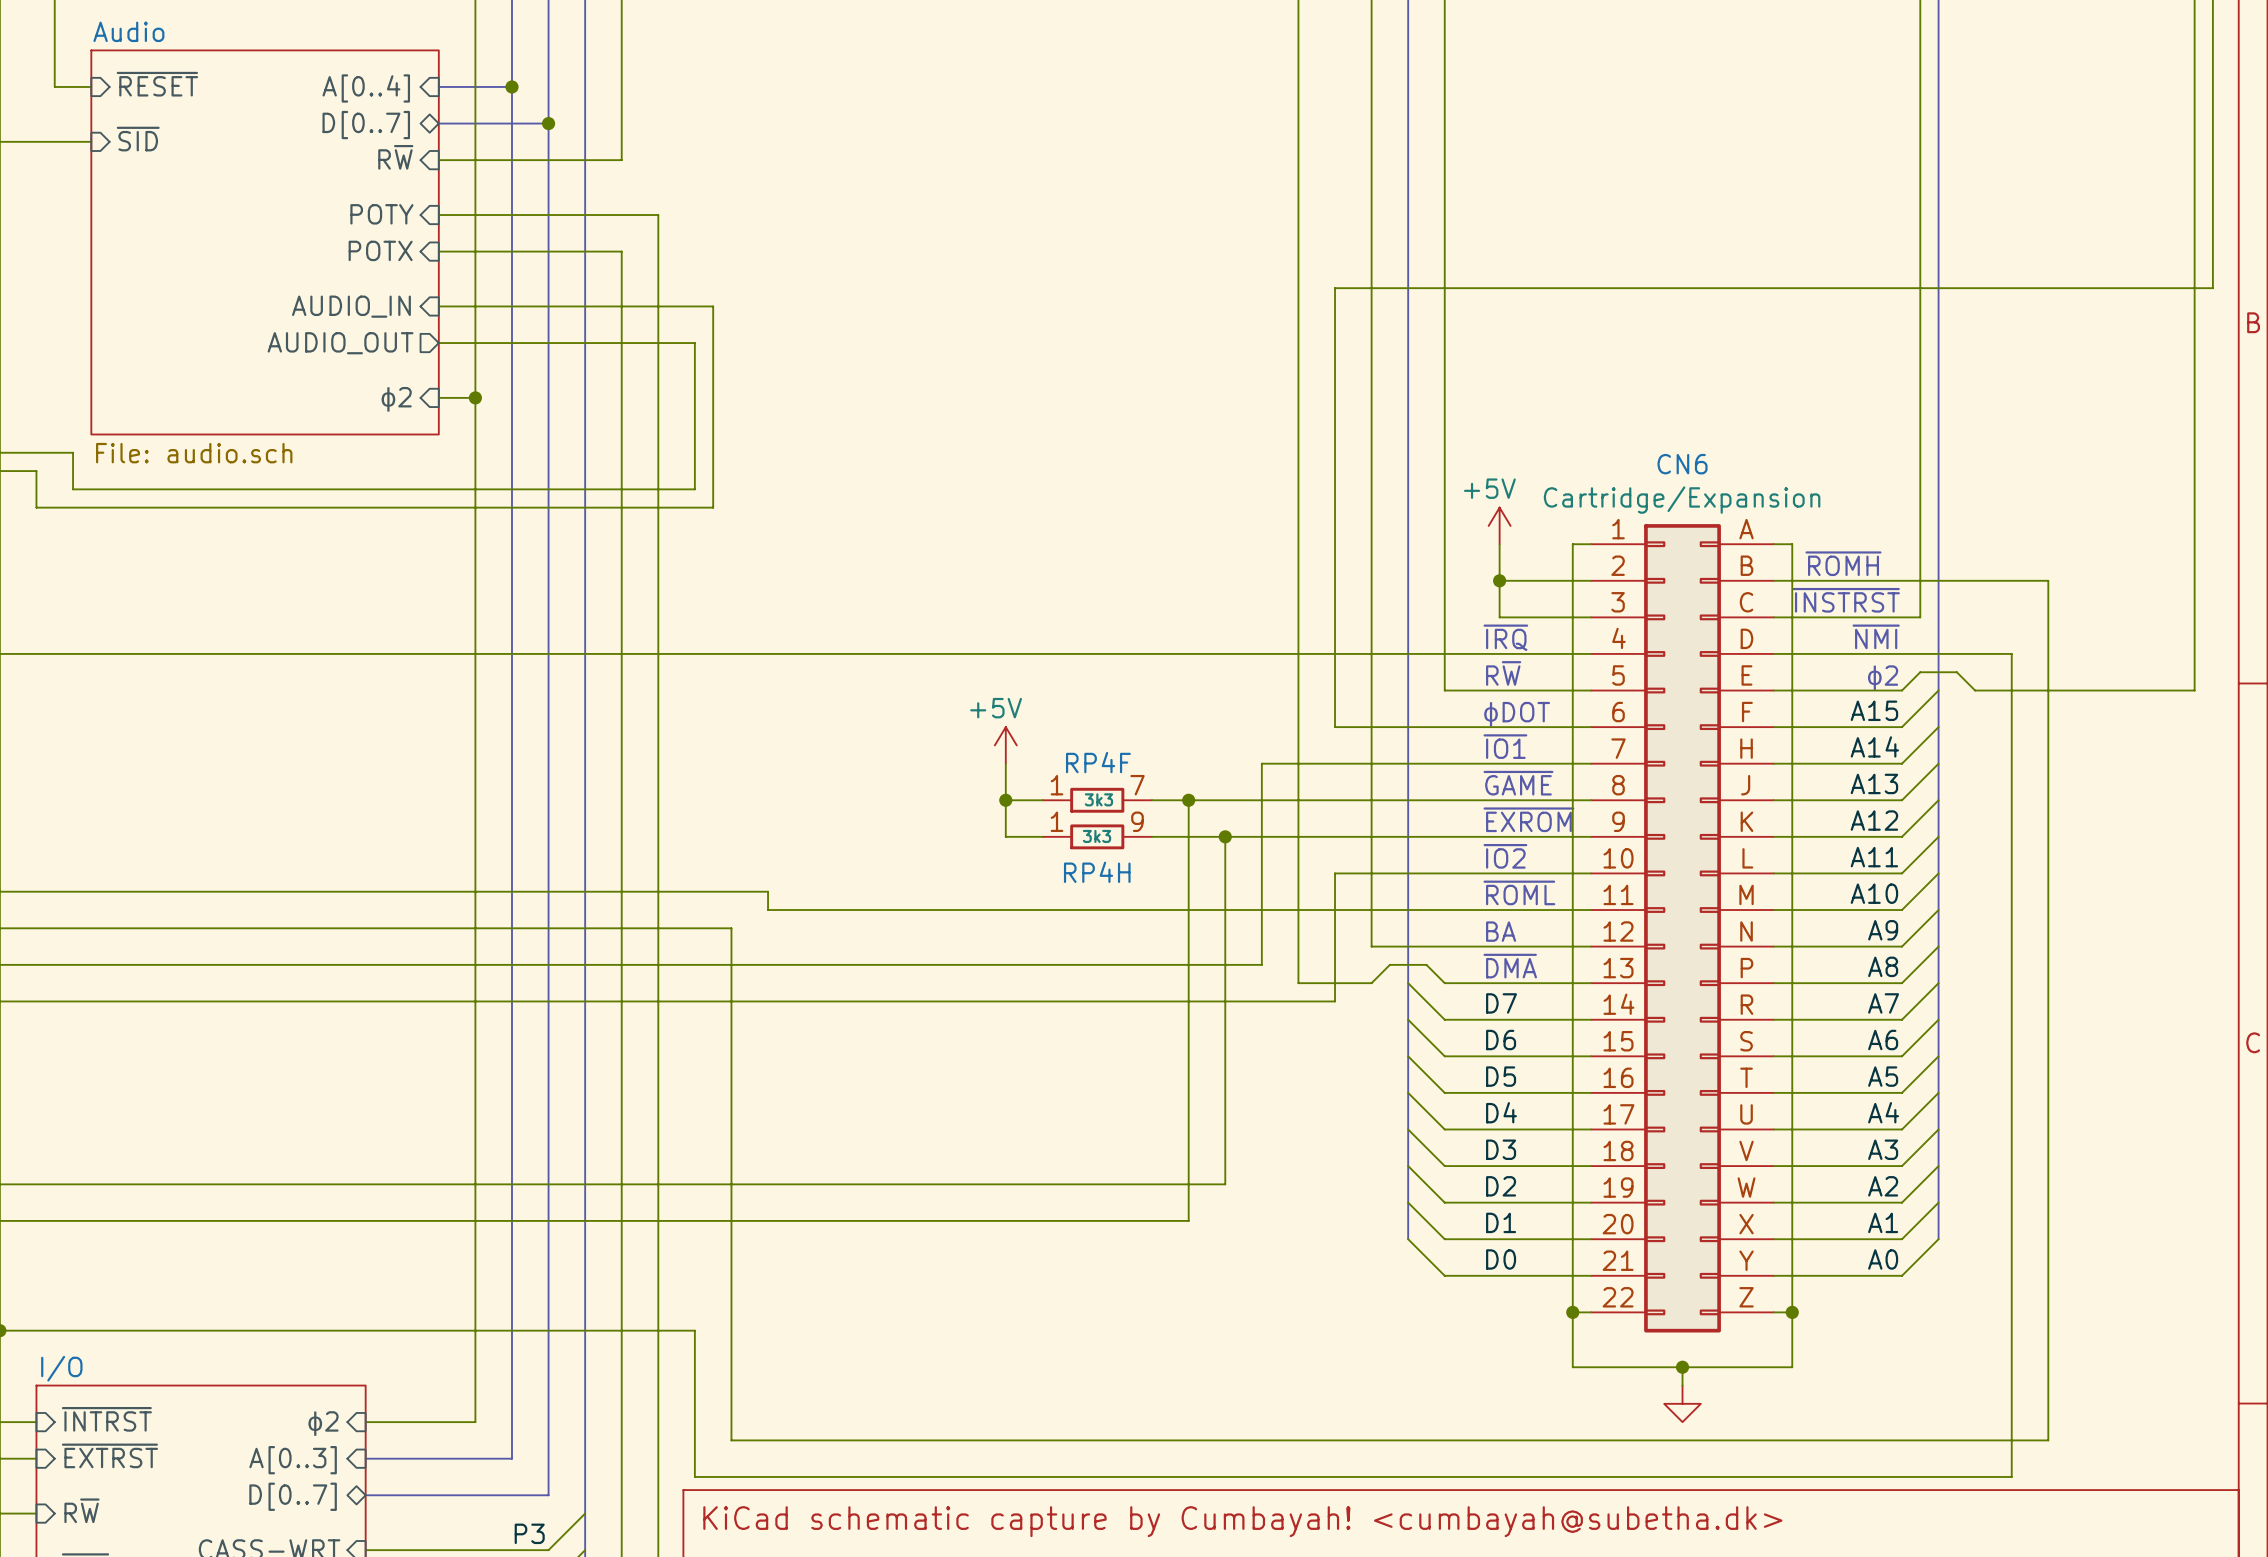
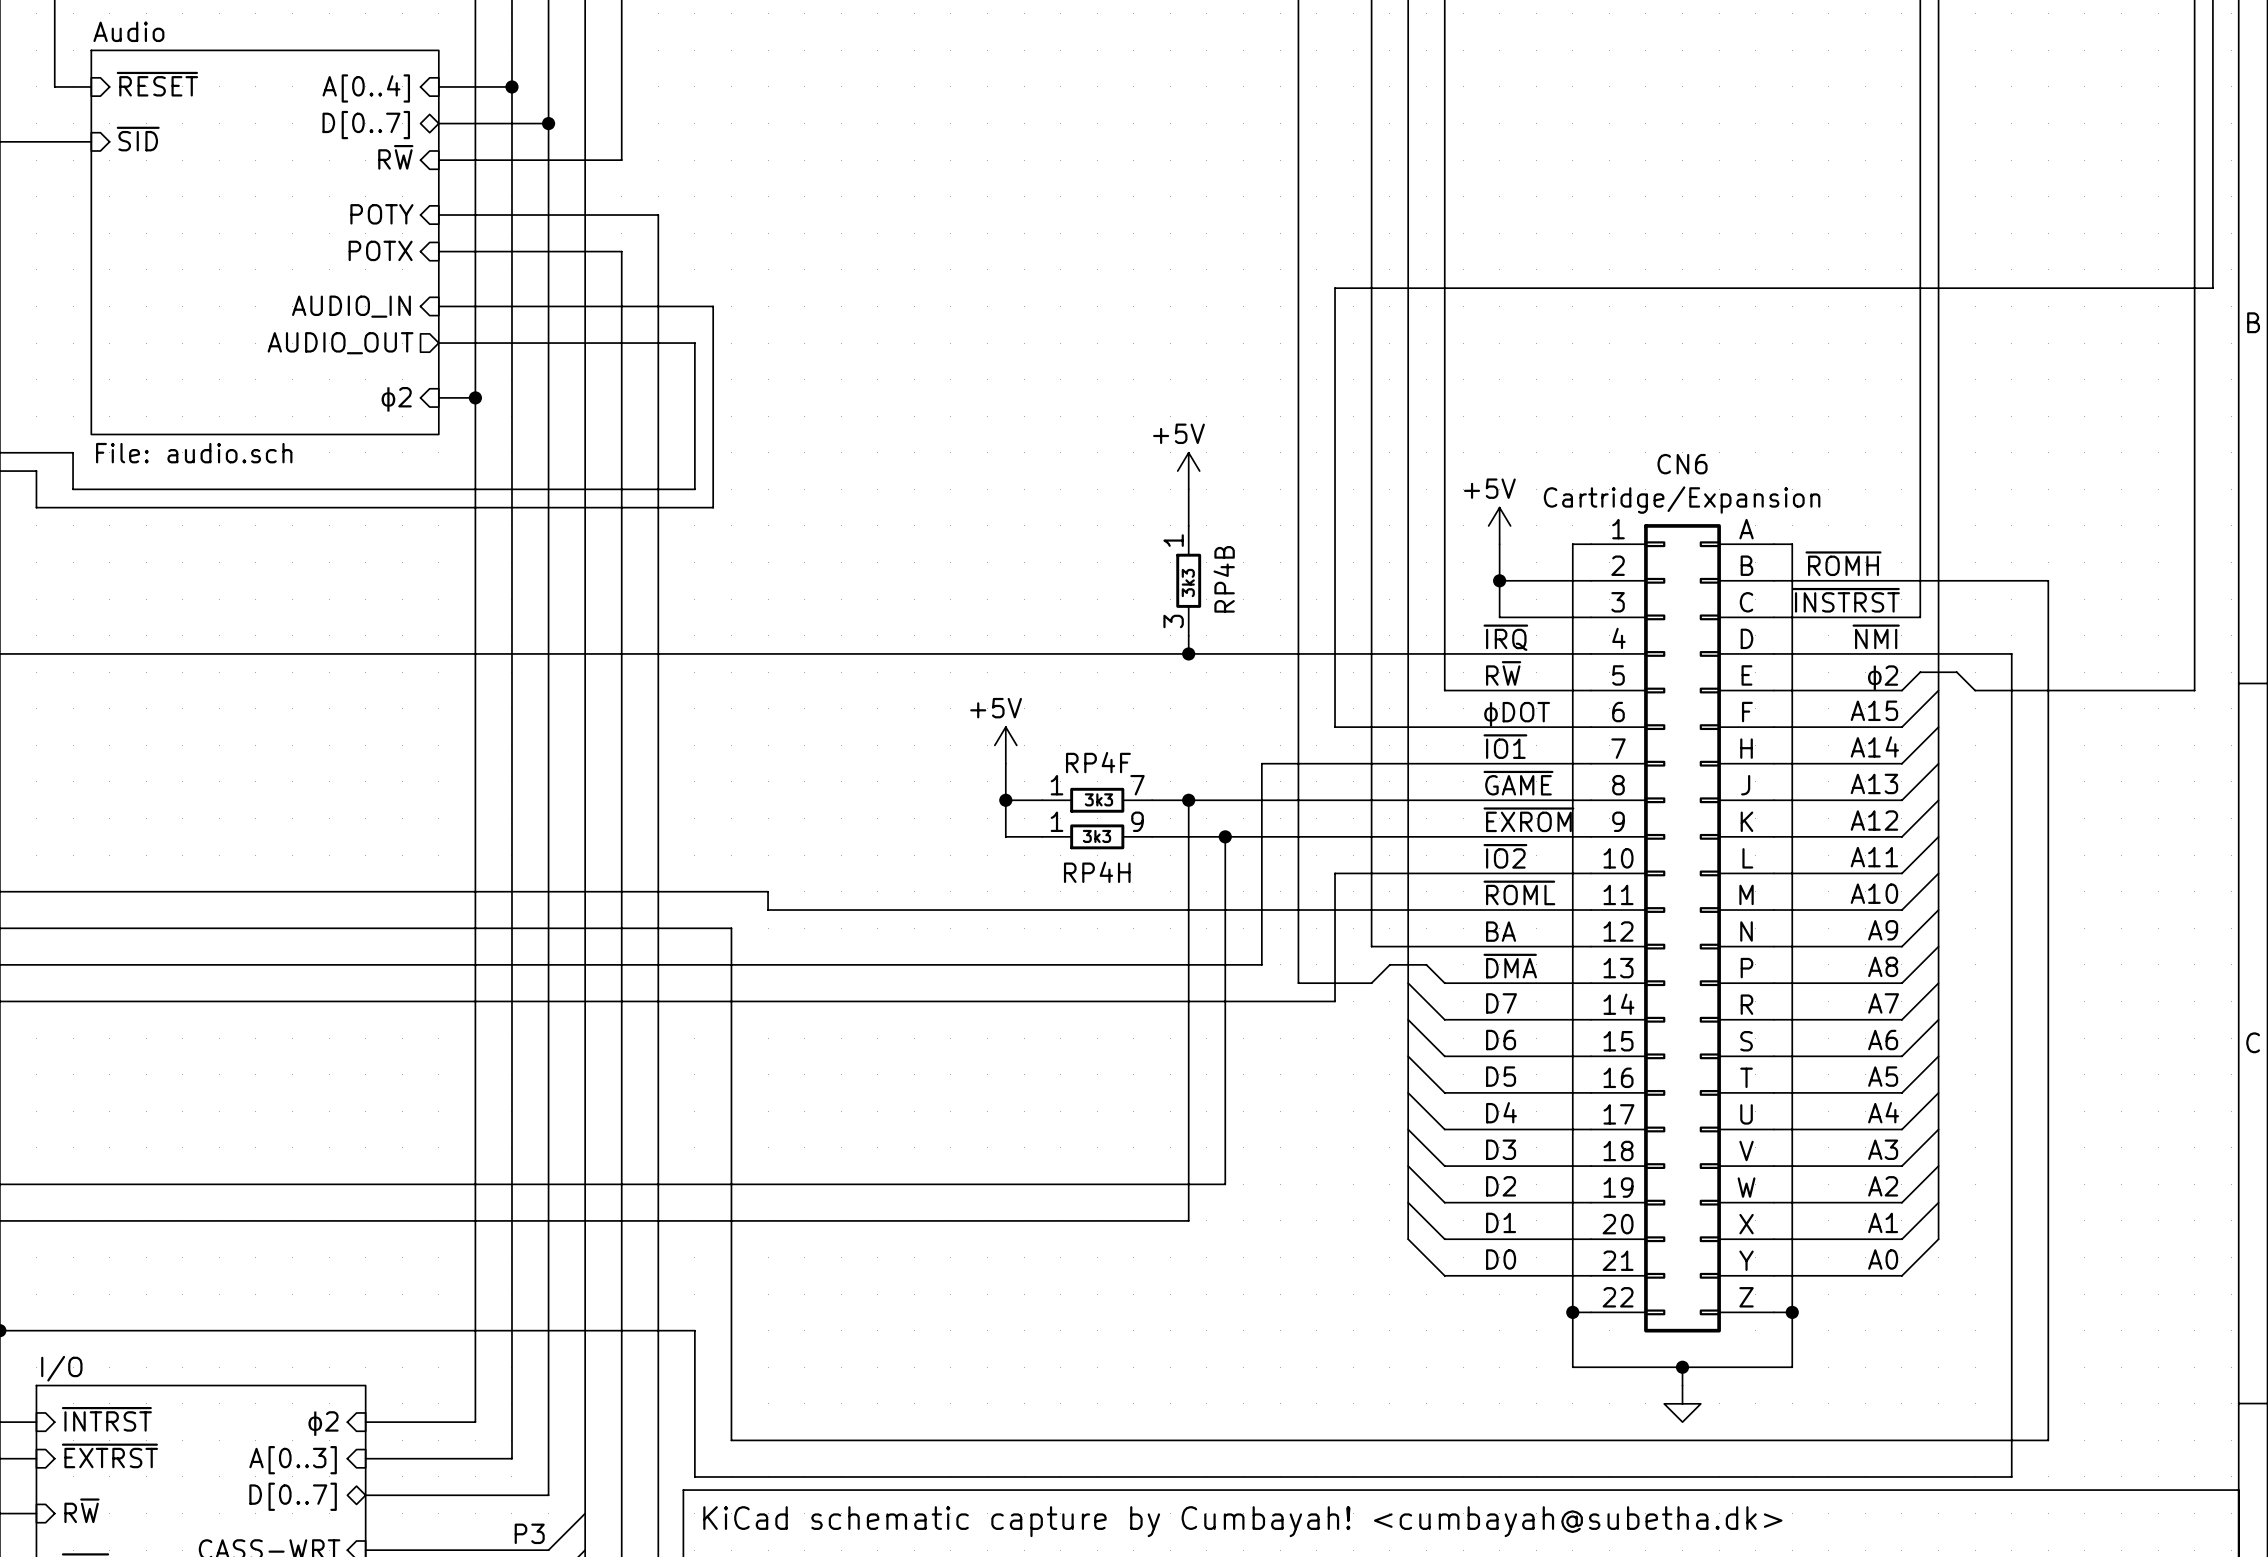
power symbol: none -> +5V (1188, 471)
wire: none -> (1188, 489) (1188, 525)
RP4B: none -> 3k3 (1188, 580)
wire: none -> (1188, 635) (1188, 653)
junction: none -> (1188, 653)

